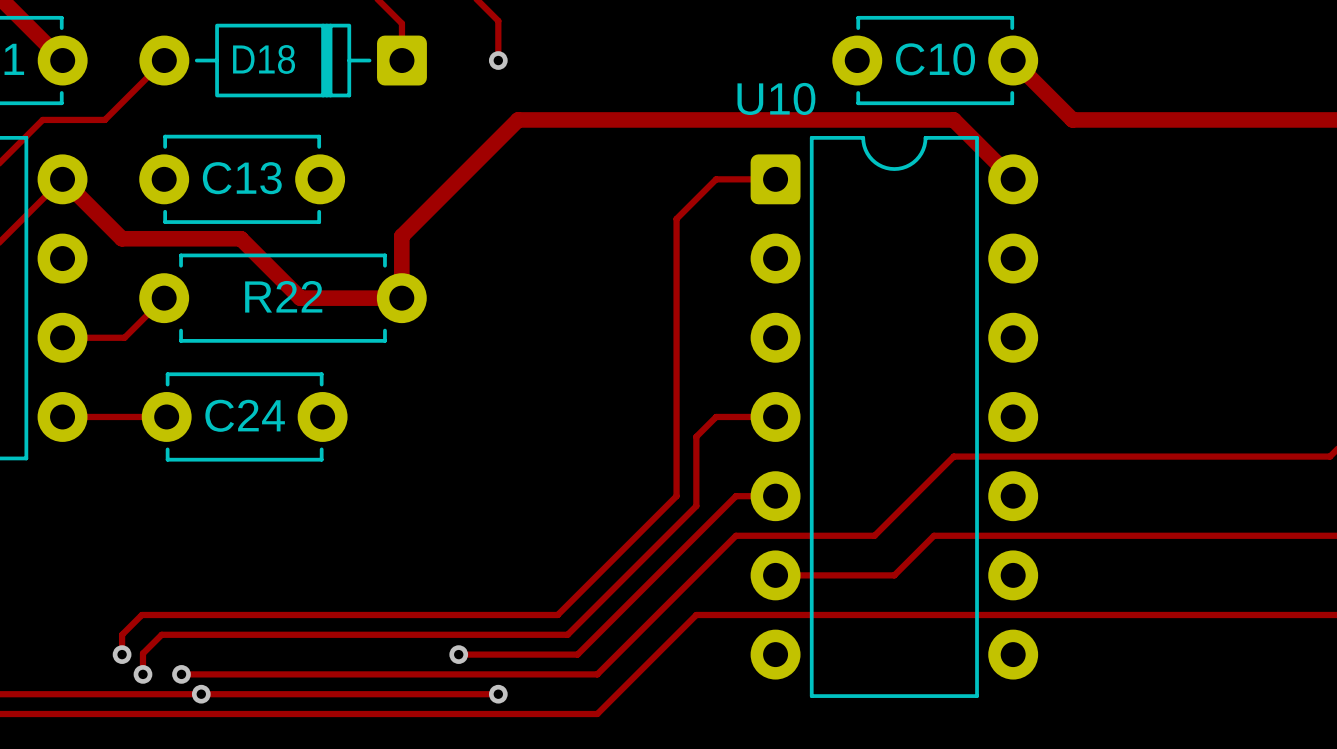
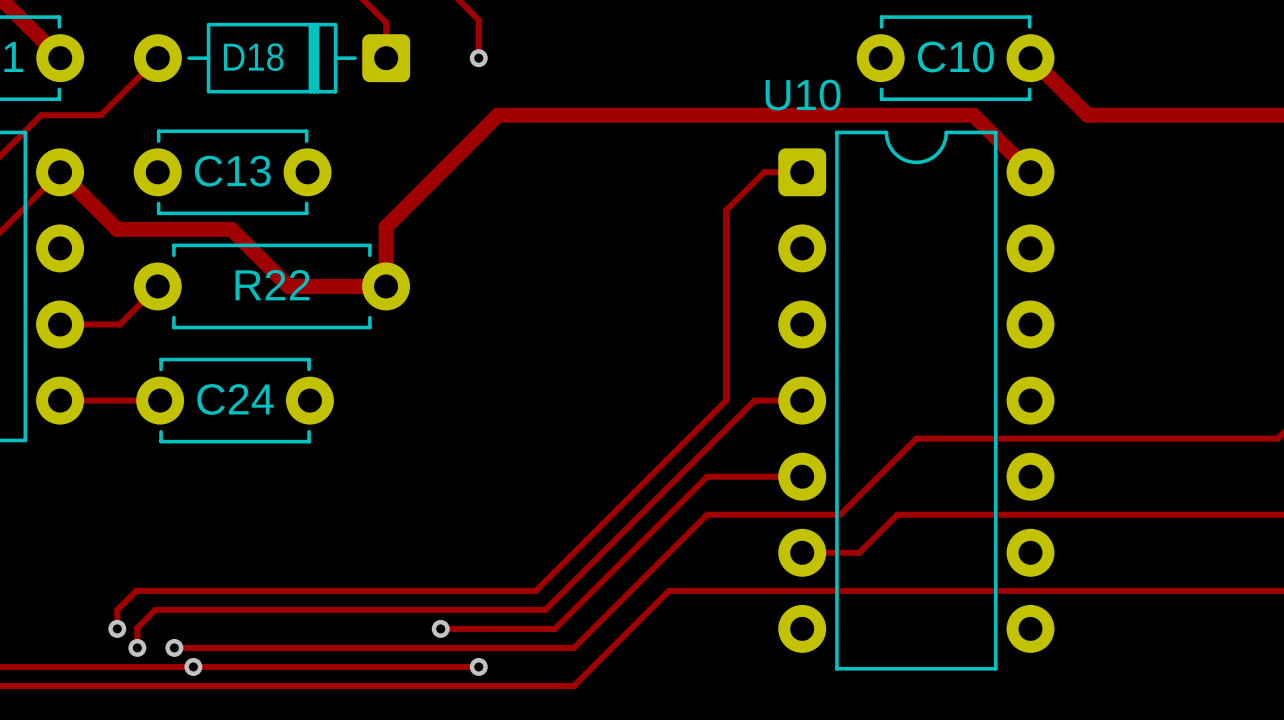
C10 position: (935, 60) -> (955, 58)
track: (1013, 60) (1072, 119) (1132, 119) -> (1030, 58) (1087, 115)
track: (953, 119) (1013, 179) -> (916, 115) (973, 115) (1030, 172)
track: (775, 179) (716, 179) (676, 218) (676, 496) -> (802, 172) (764, 172) (726, 210) (726, 400) (649, 476)
track: (775, 416) (716, 416) (696, 436) (696, 506) -> (802, 400) (754, 400) (669, 486)
U10 position: (894, 416) -> (916, 400)
track: (775, 575) (834, 575) -> (745, 476) (802, 476)

